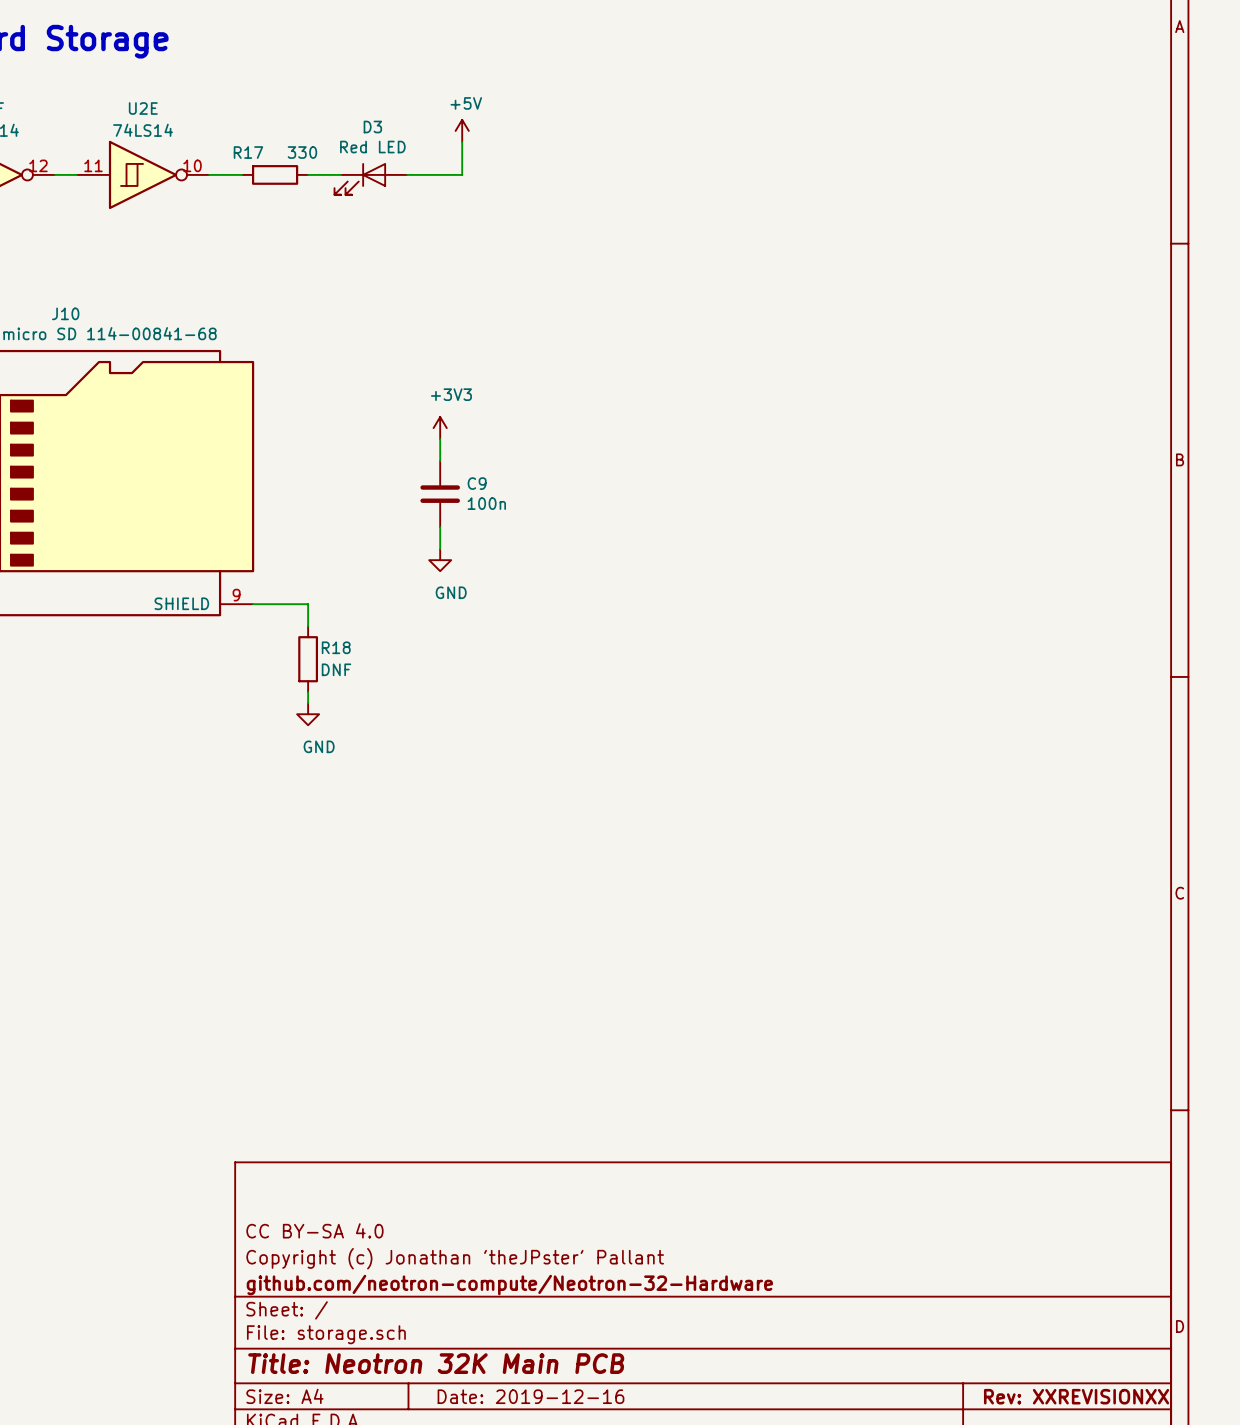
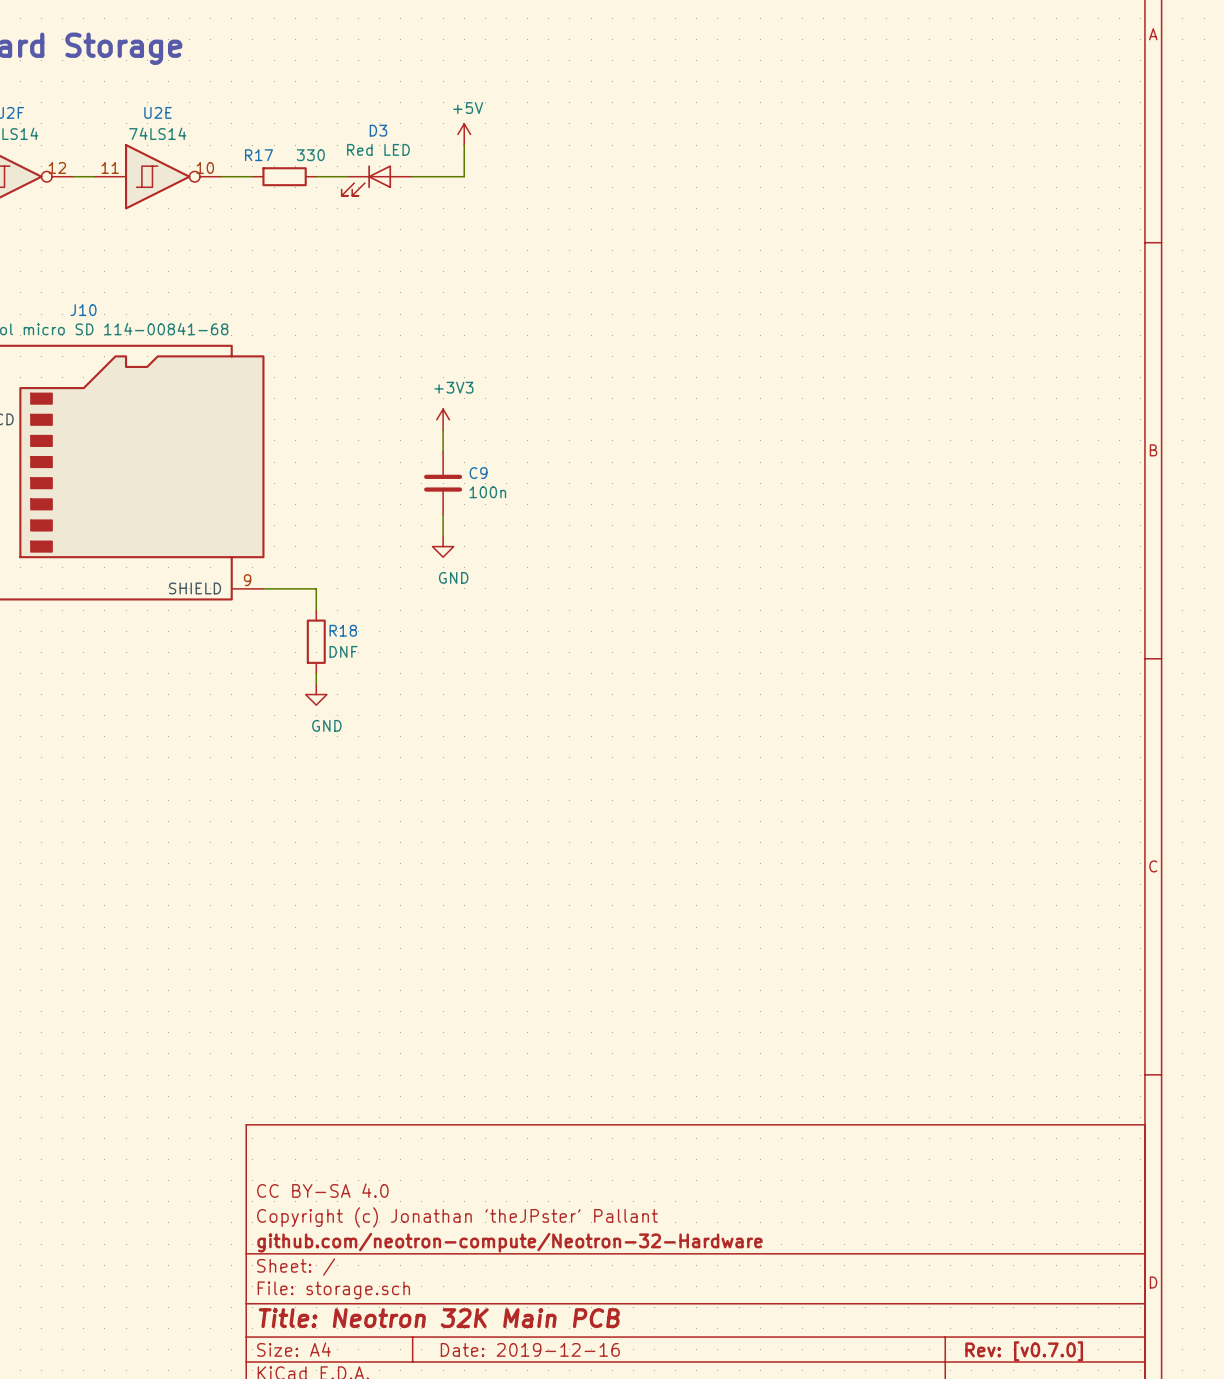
title block: Rev: XXREVISIONXX (1076, 1396) -> Rev: [v0.7.0] (1024, 1351)

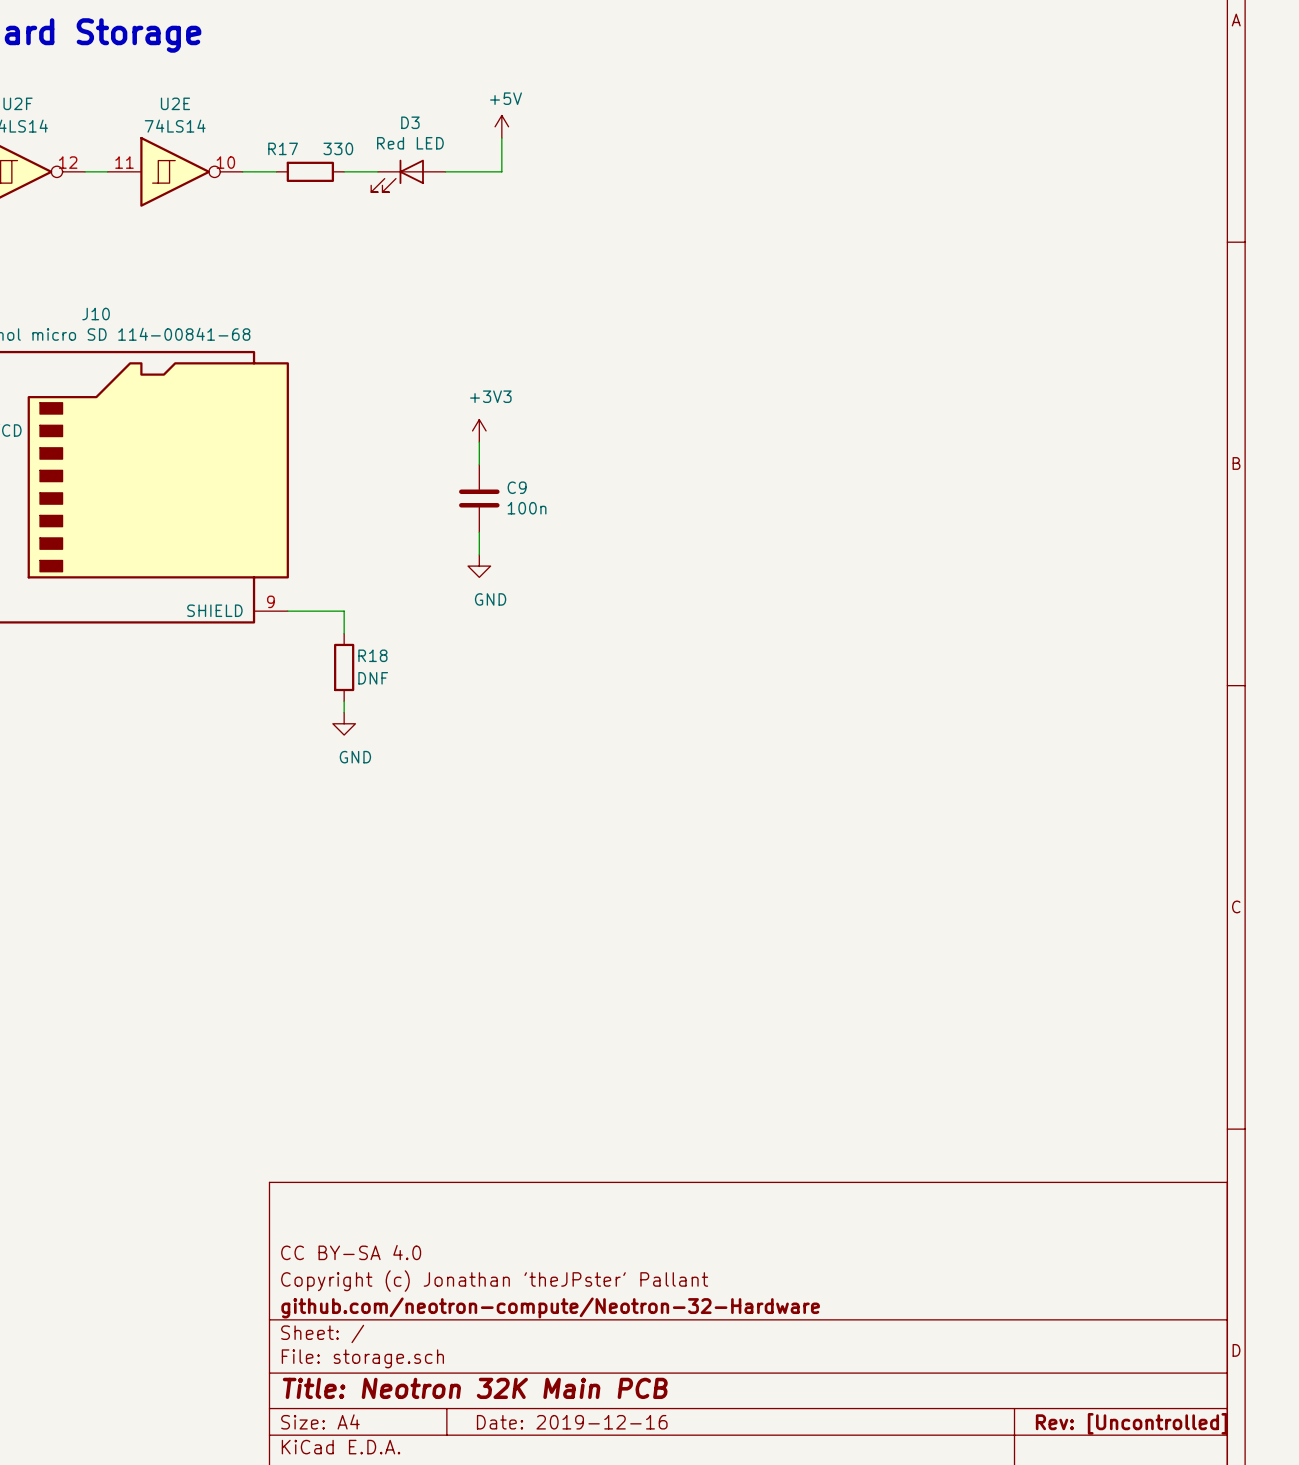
title block: Rev: [v0.7.0] (1024, 1351) -> Rev: [Uncontrolled] (1131, 1423)

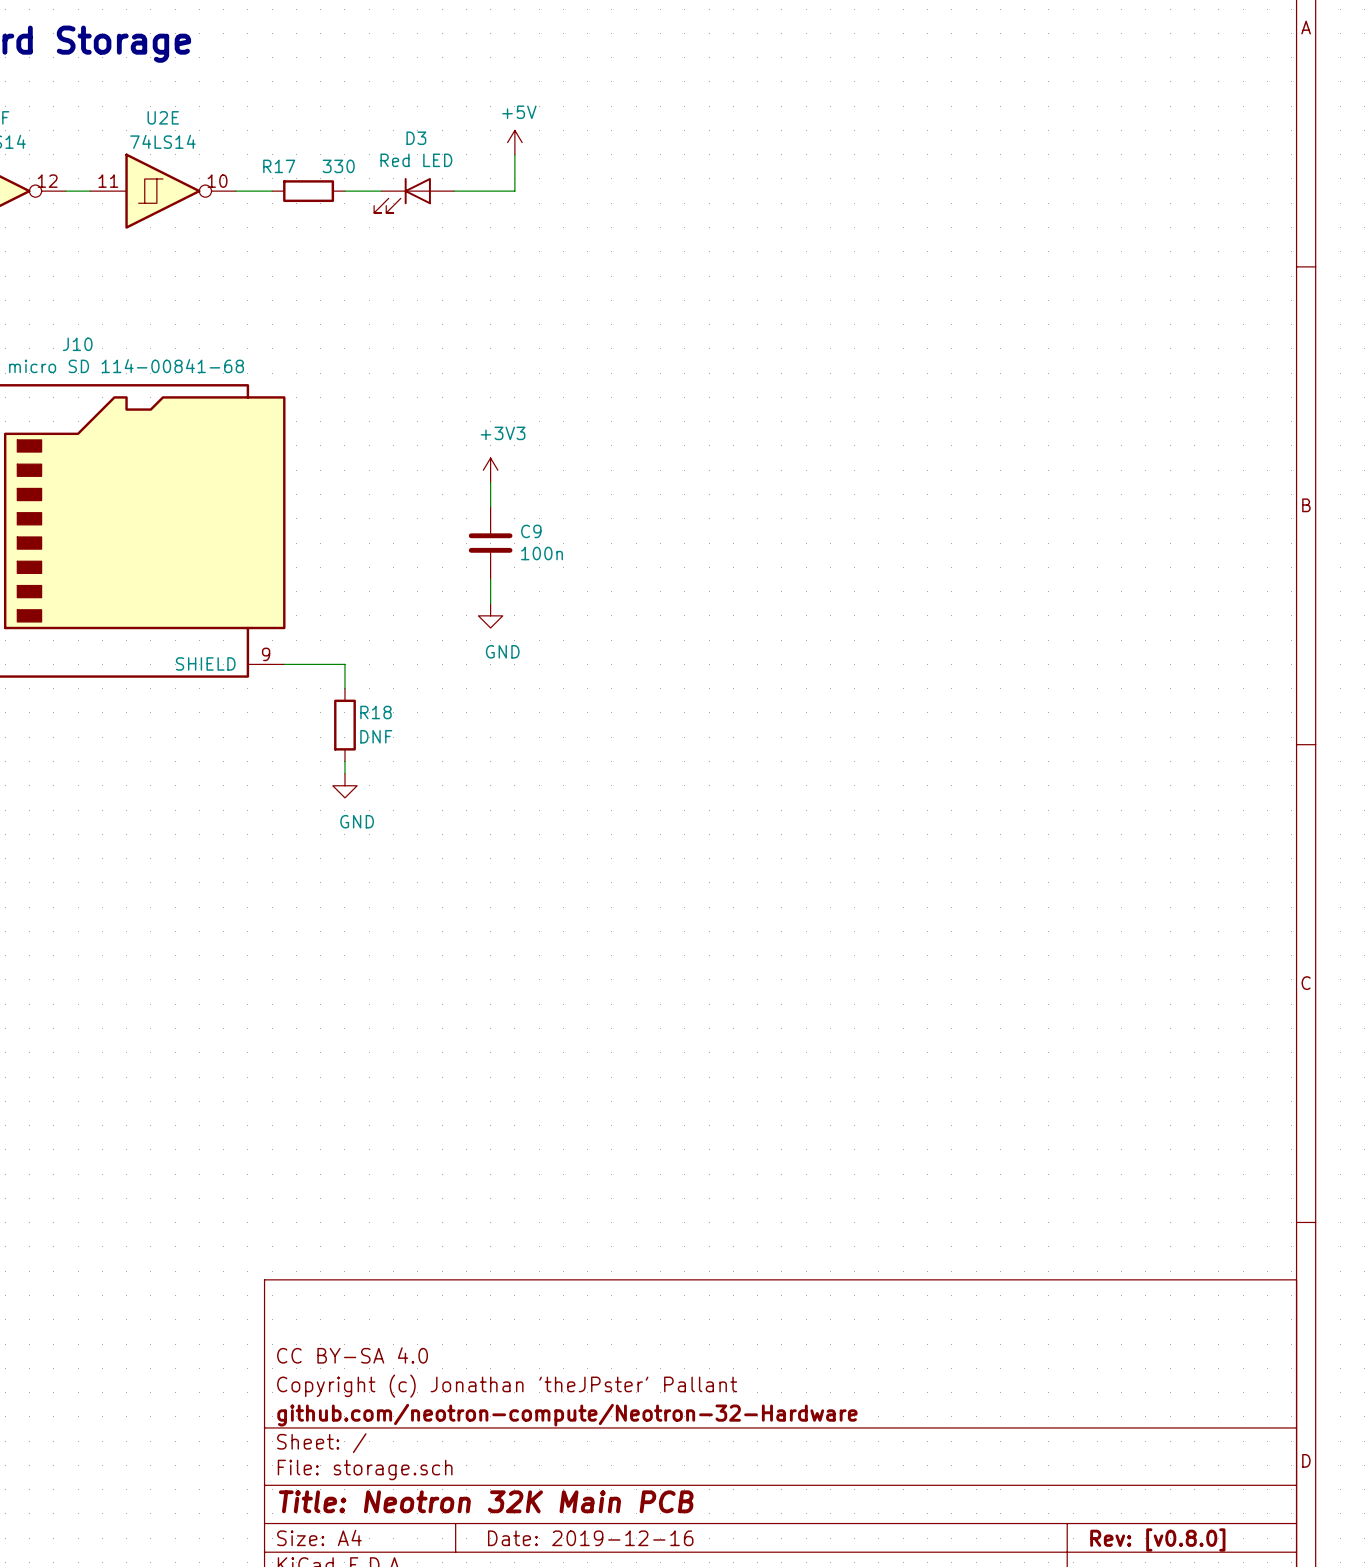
title block: Rev: [Uncontrolled] (1131, 1423) -> Rev: [v0.8.0] (1157, 1539)

